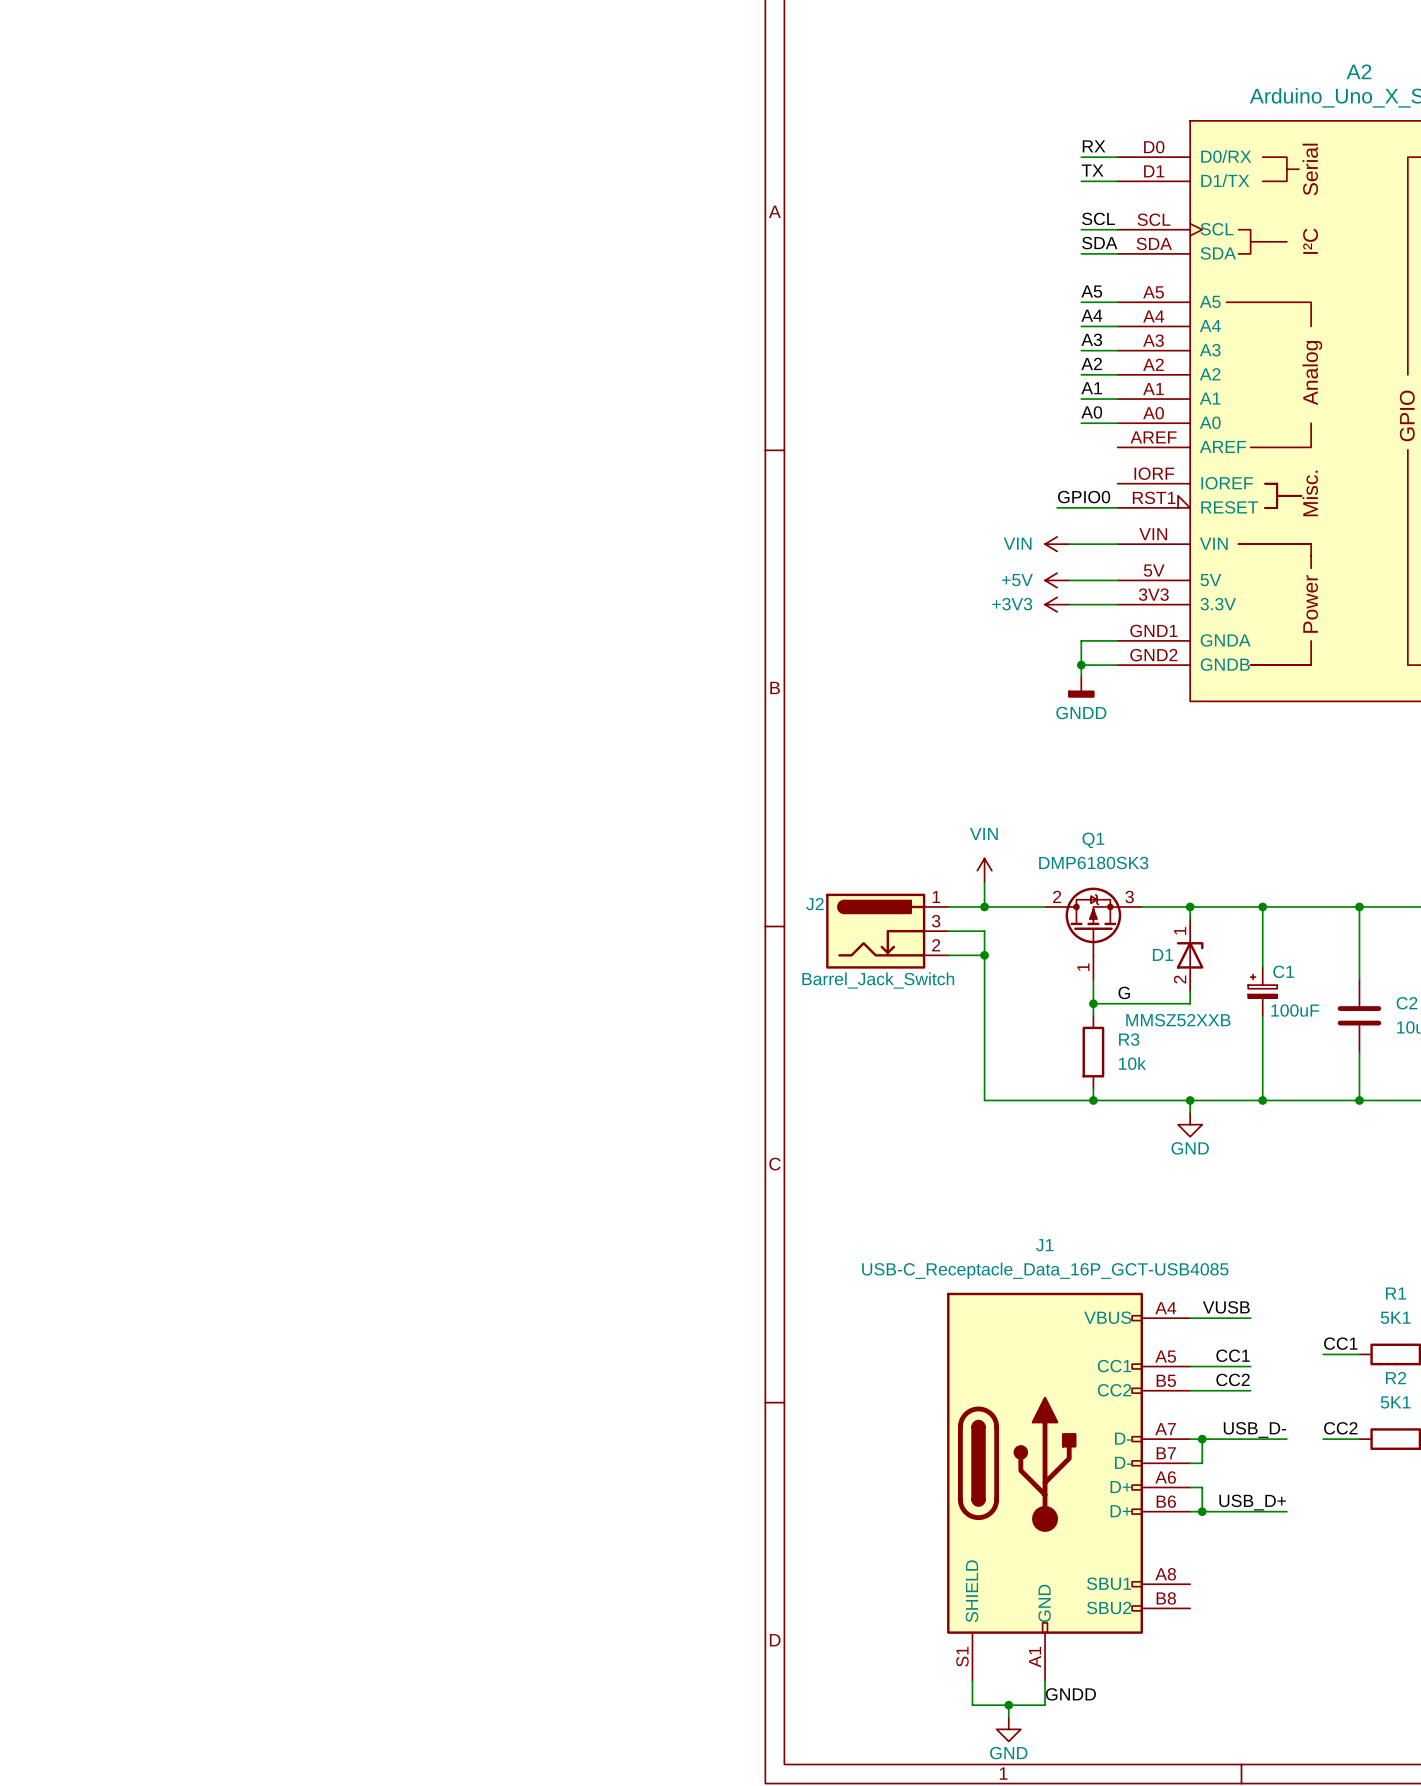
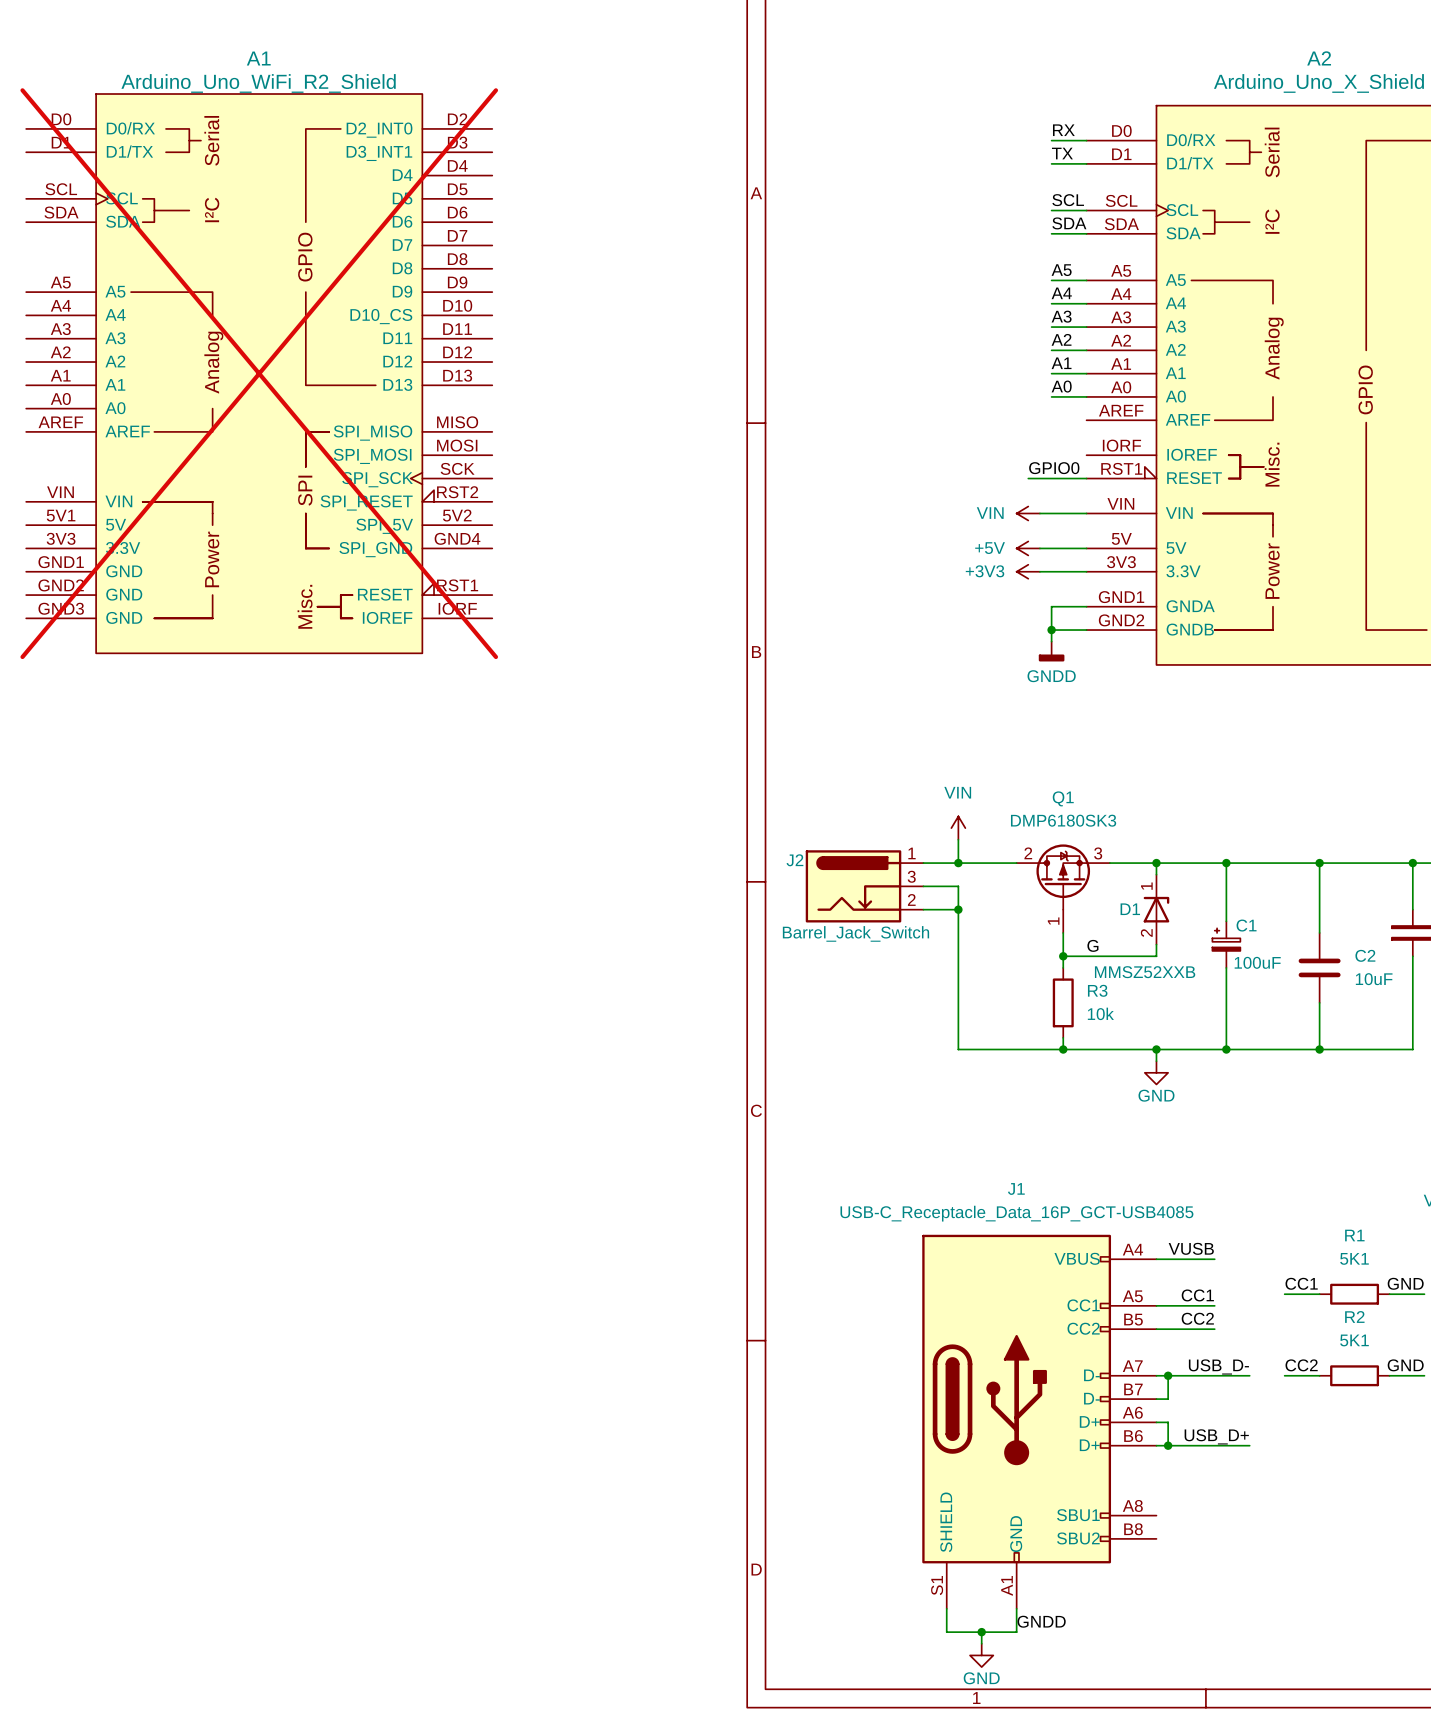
A1: none -> Arduino_Uno_WiFi_R2_Shield (259, 373)

